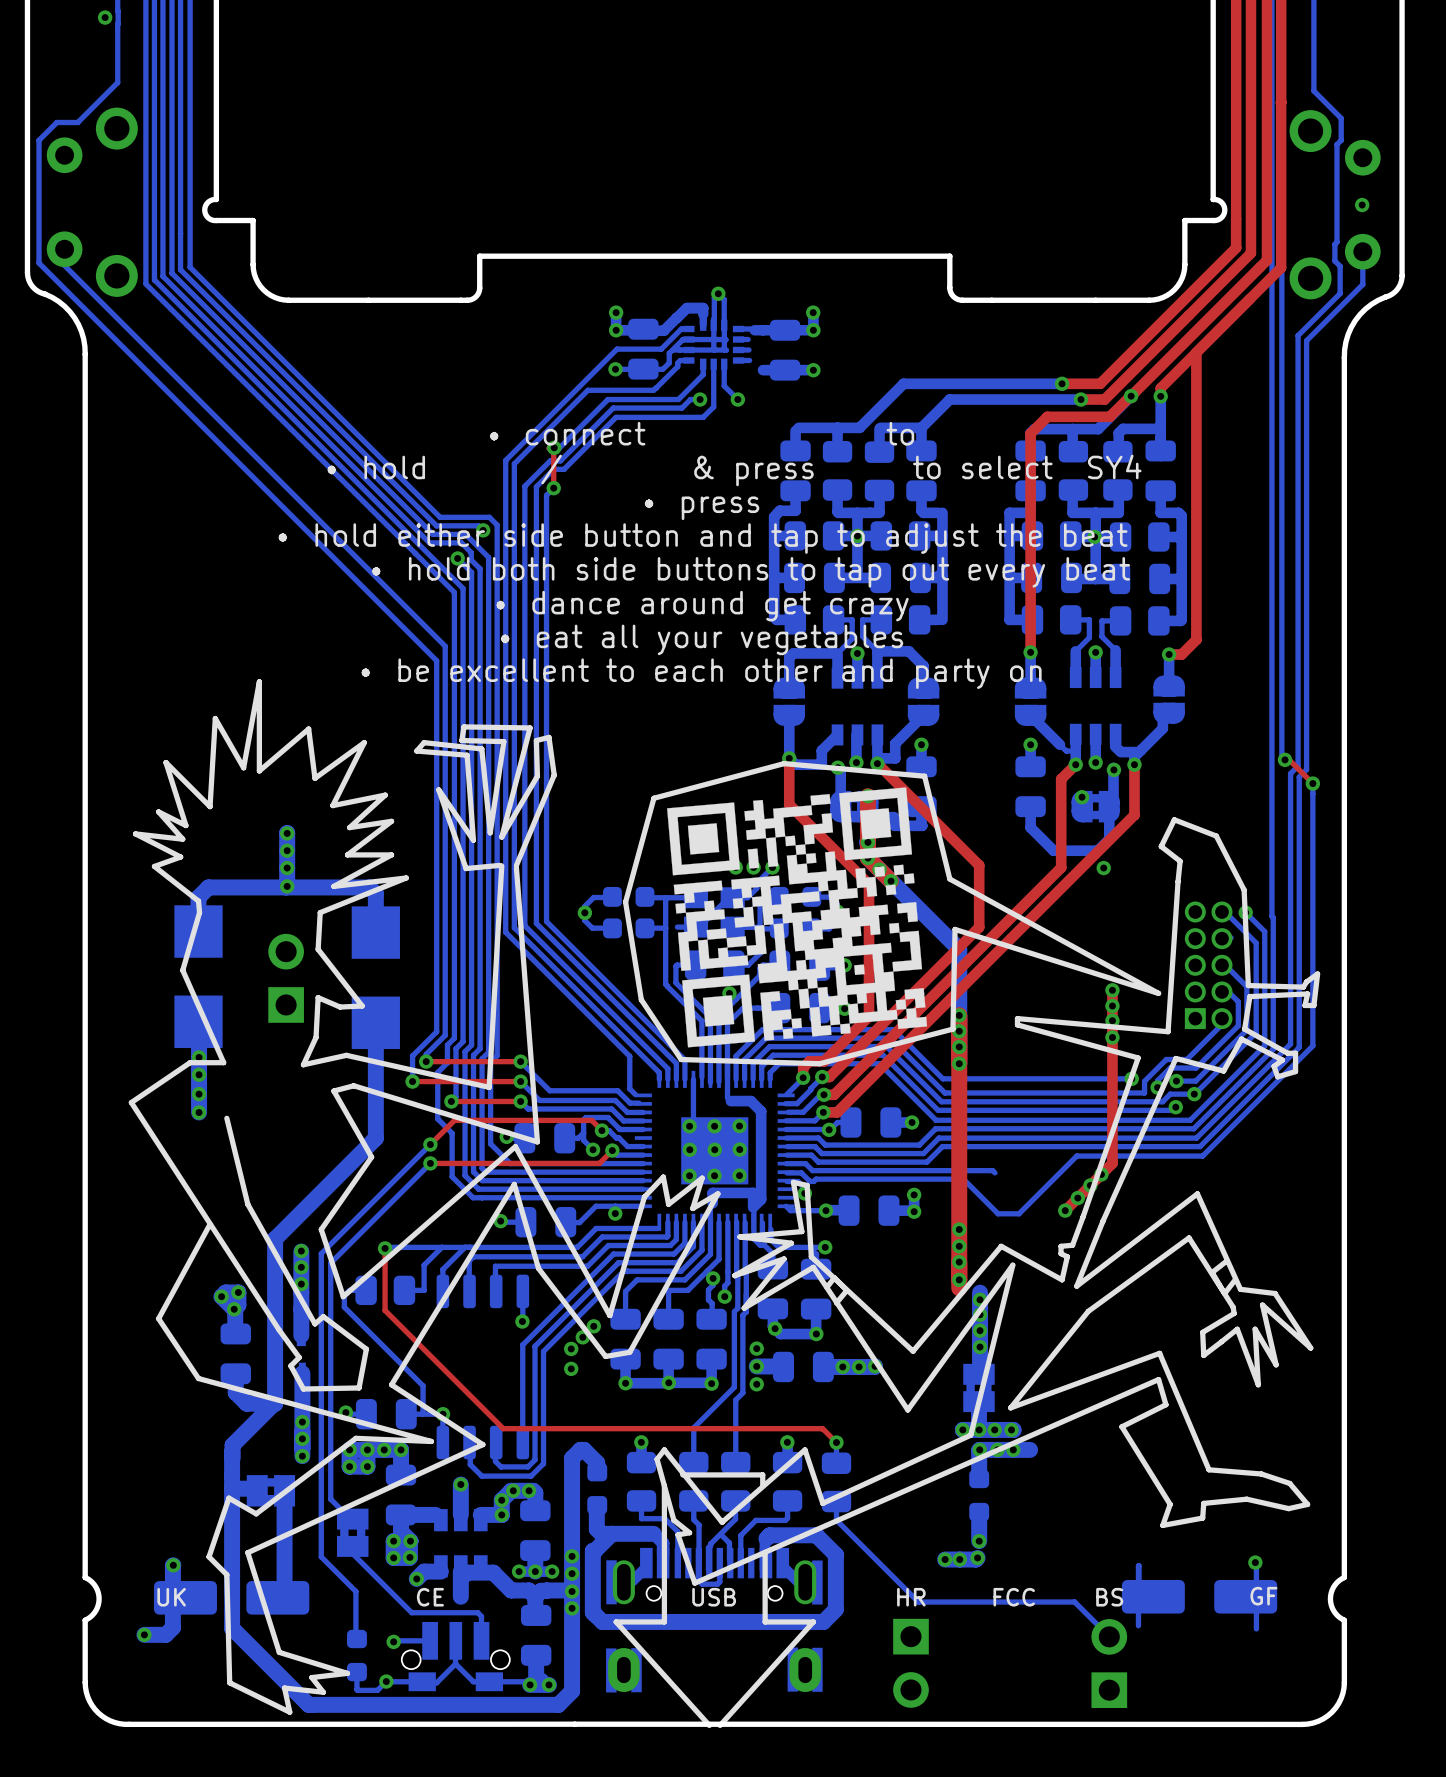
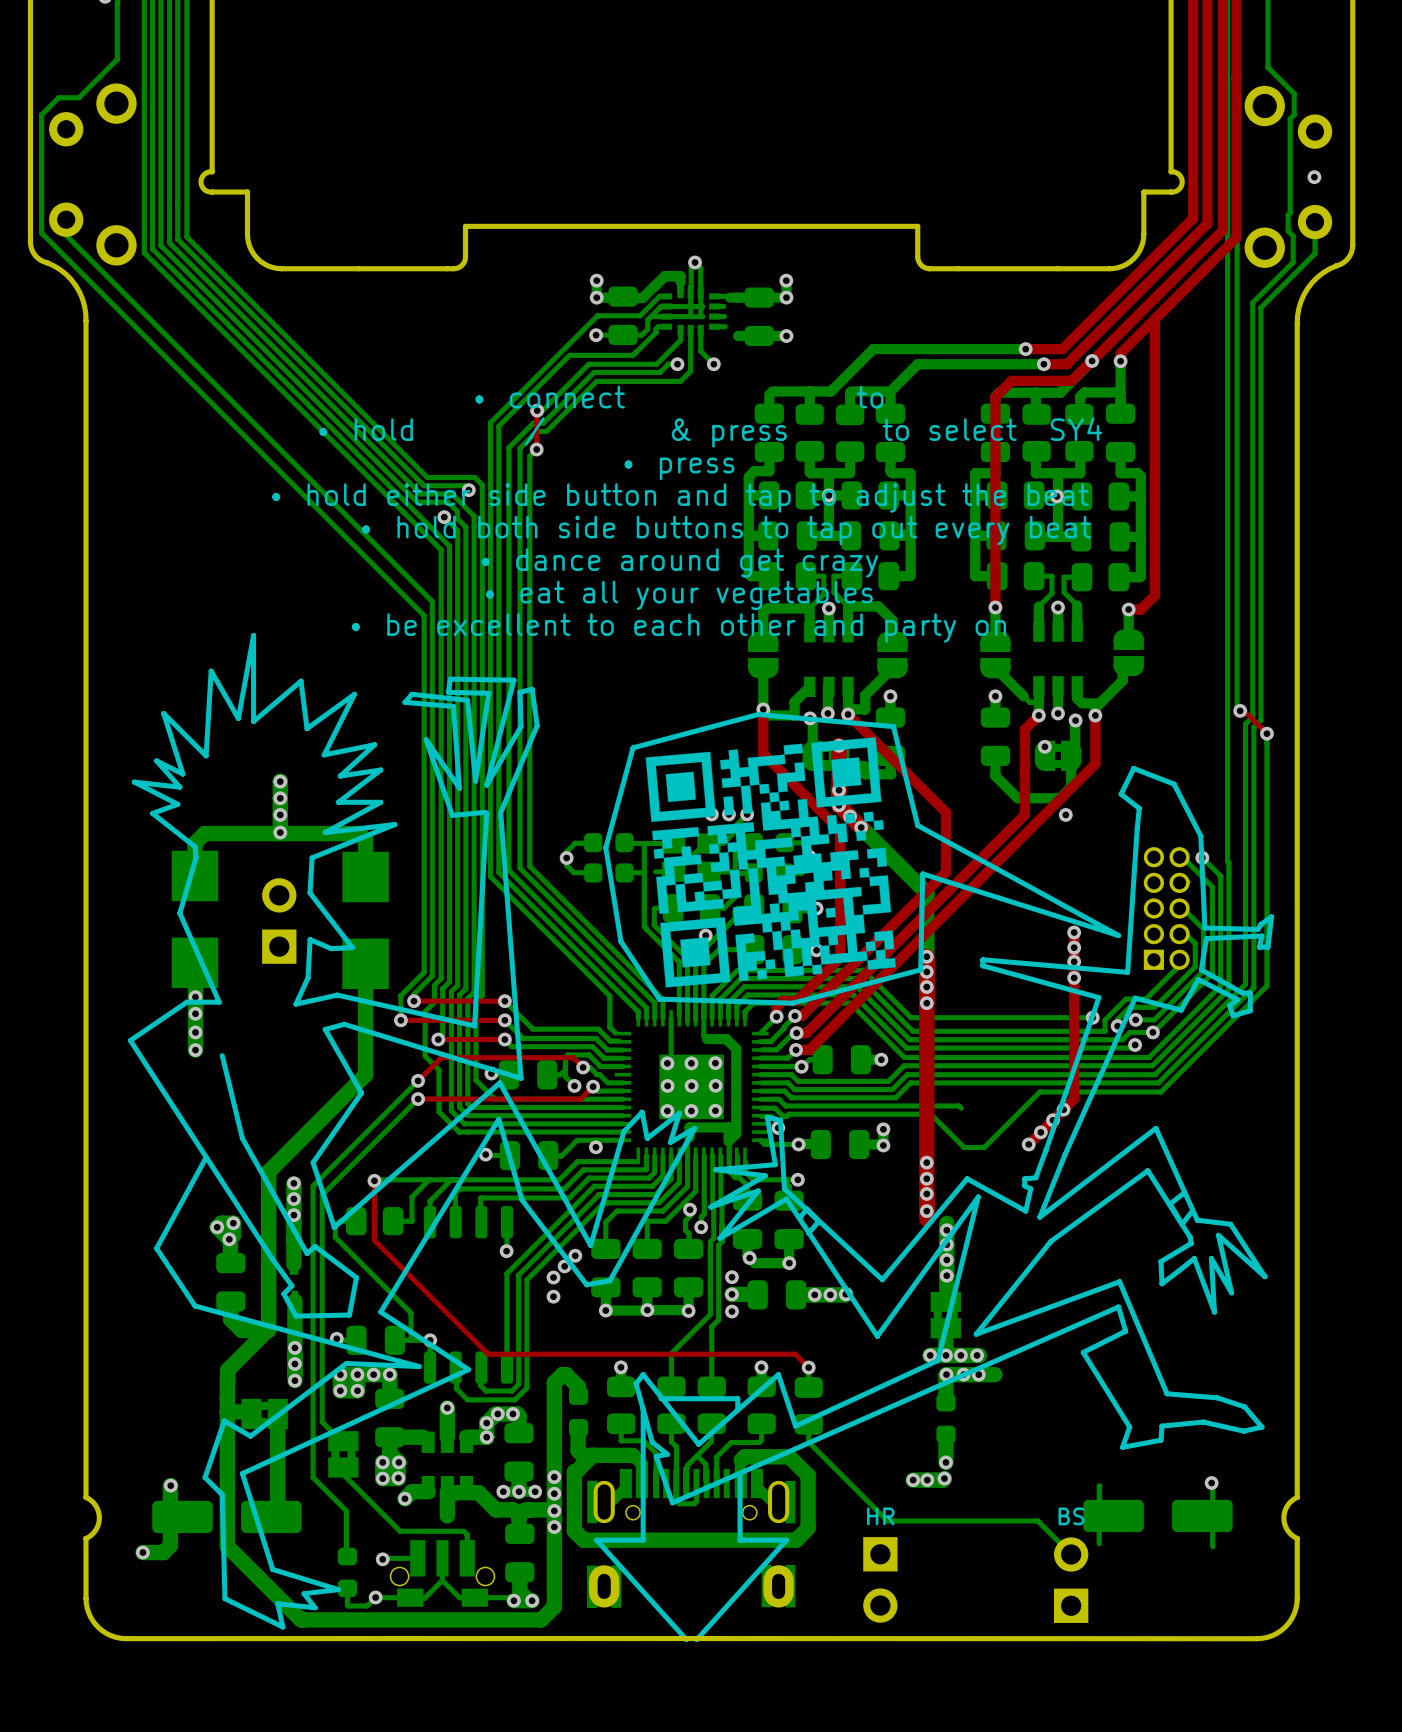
text: GF (1263, 1596) -> none
text: UK (171, 1597) -> none
text: CE (430, 1597) -> none
text: USB (714, 1597) -> none
text: FCC (1014, 1597) -> none

